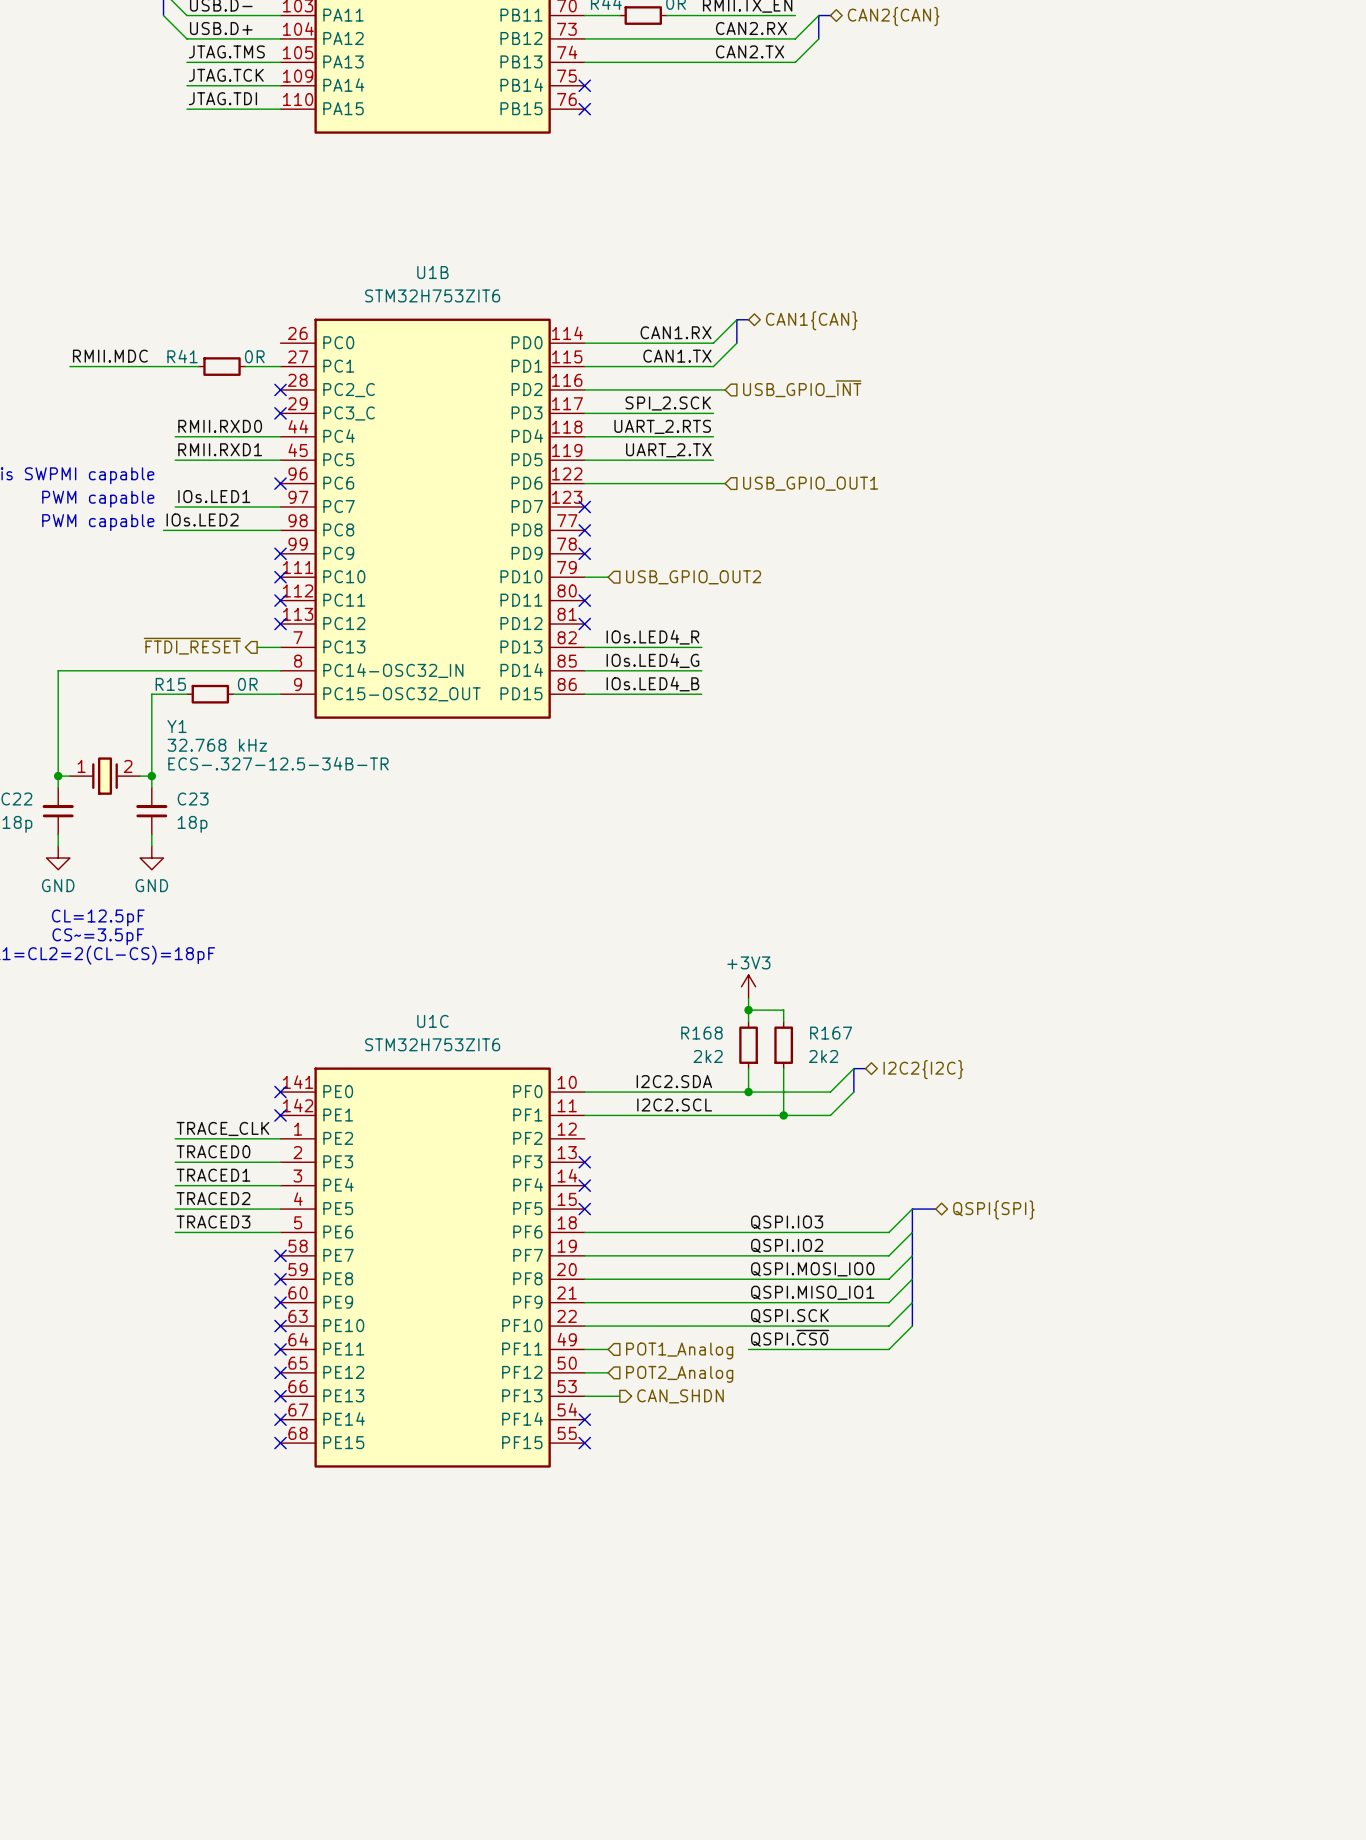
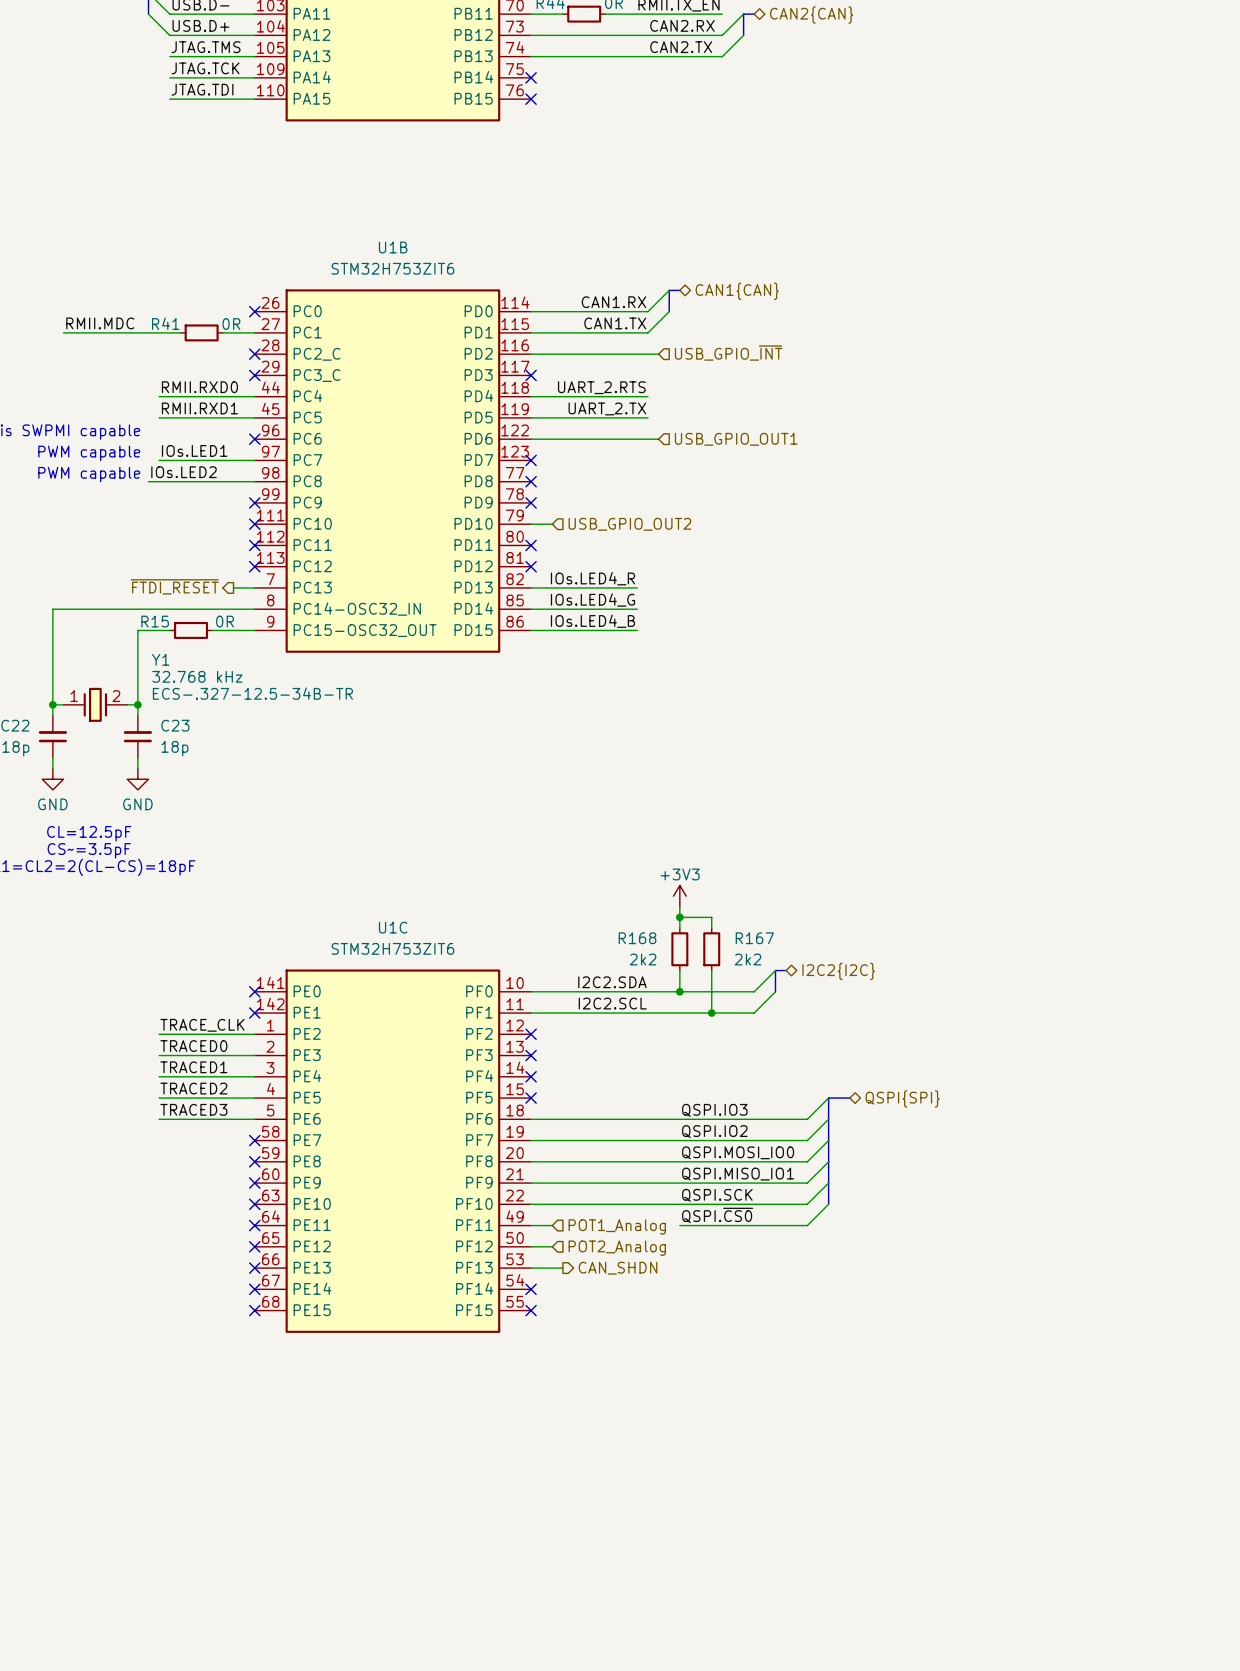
no-connect mark: none -> (254, 311)
label: SPI_2.SCK (668, 403) -> none
wire: (584, 413) (713, 413) -> none
no-connect mark: none -> (531, 375)
no-connect mark: none -> (531, 1034)

